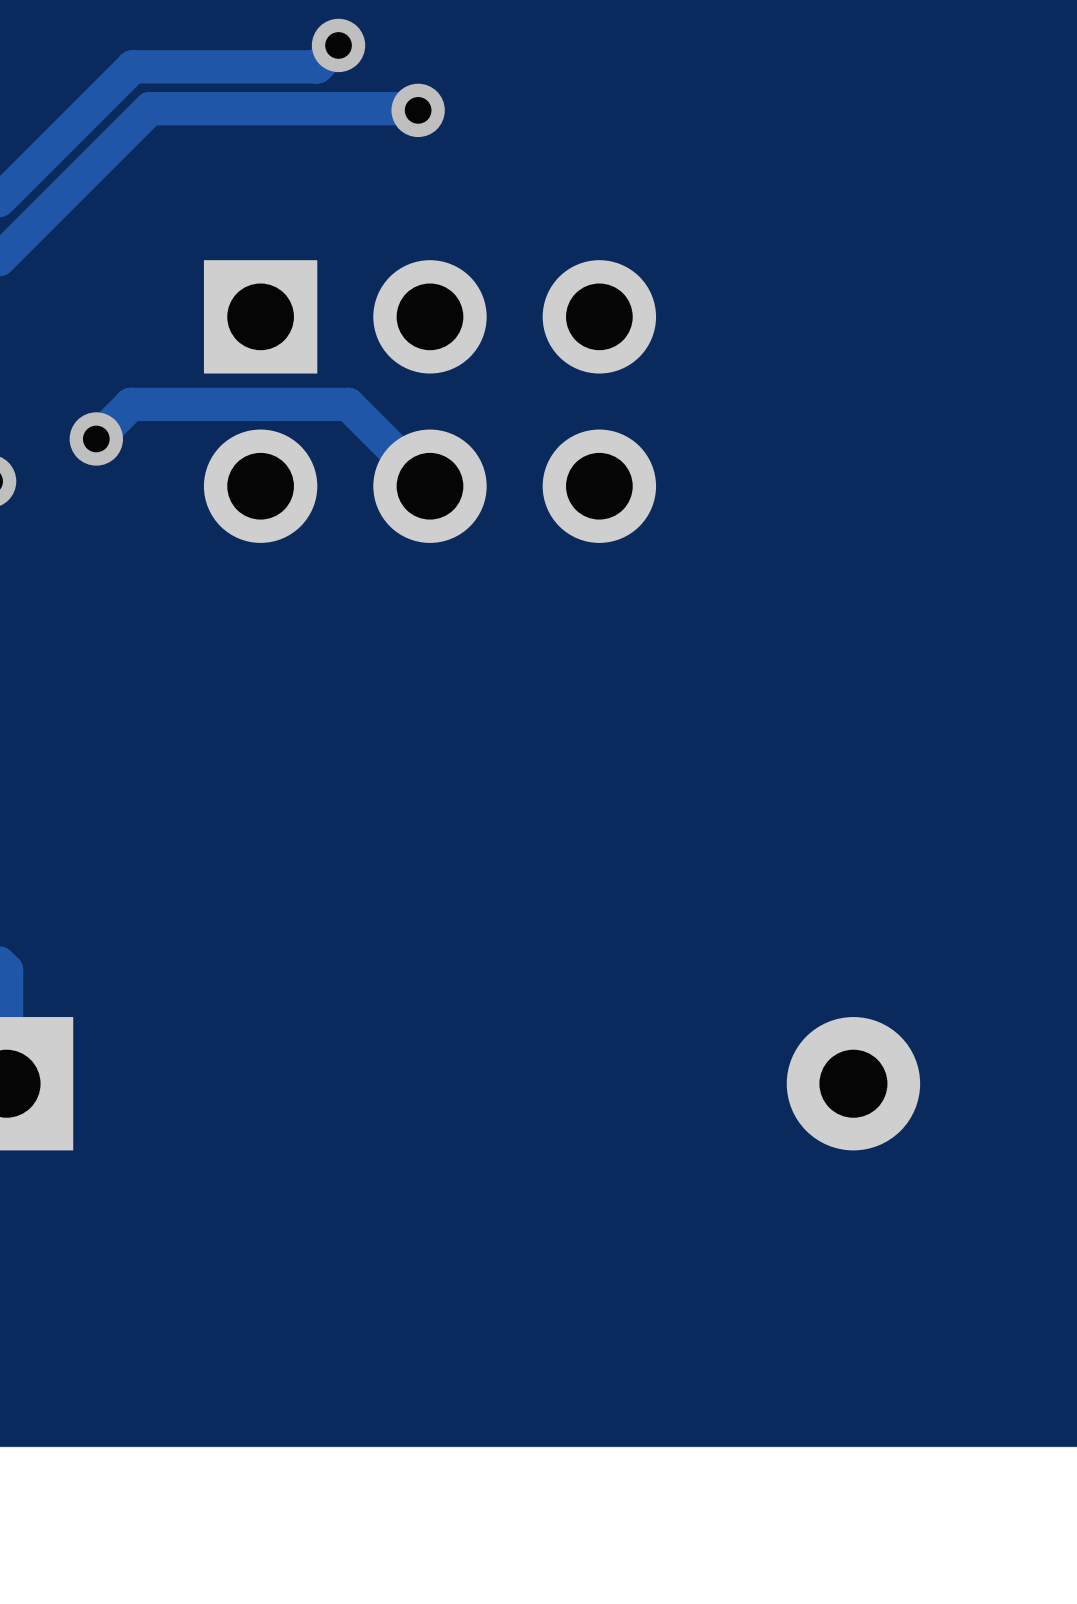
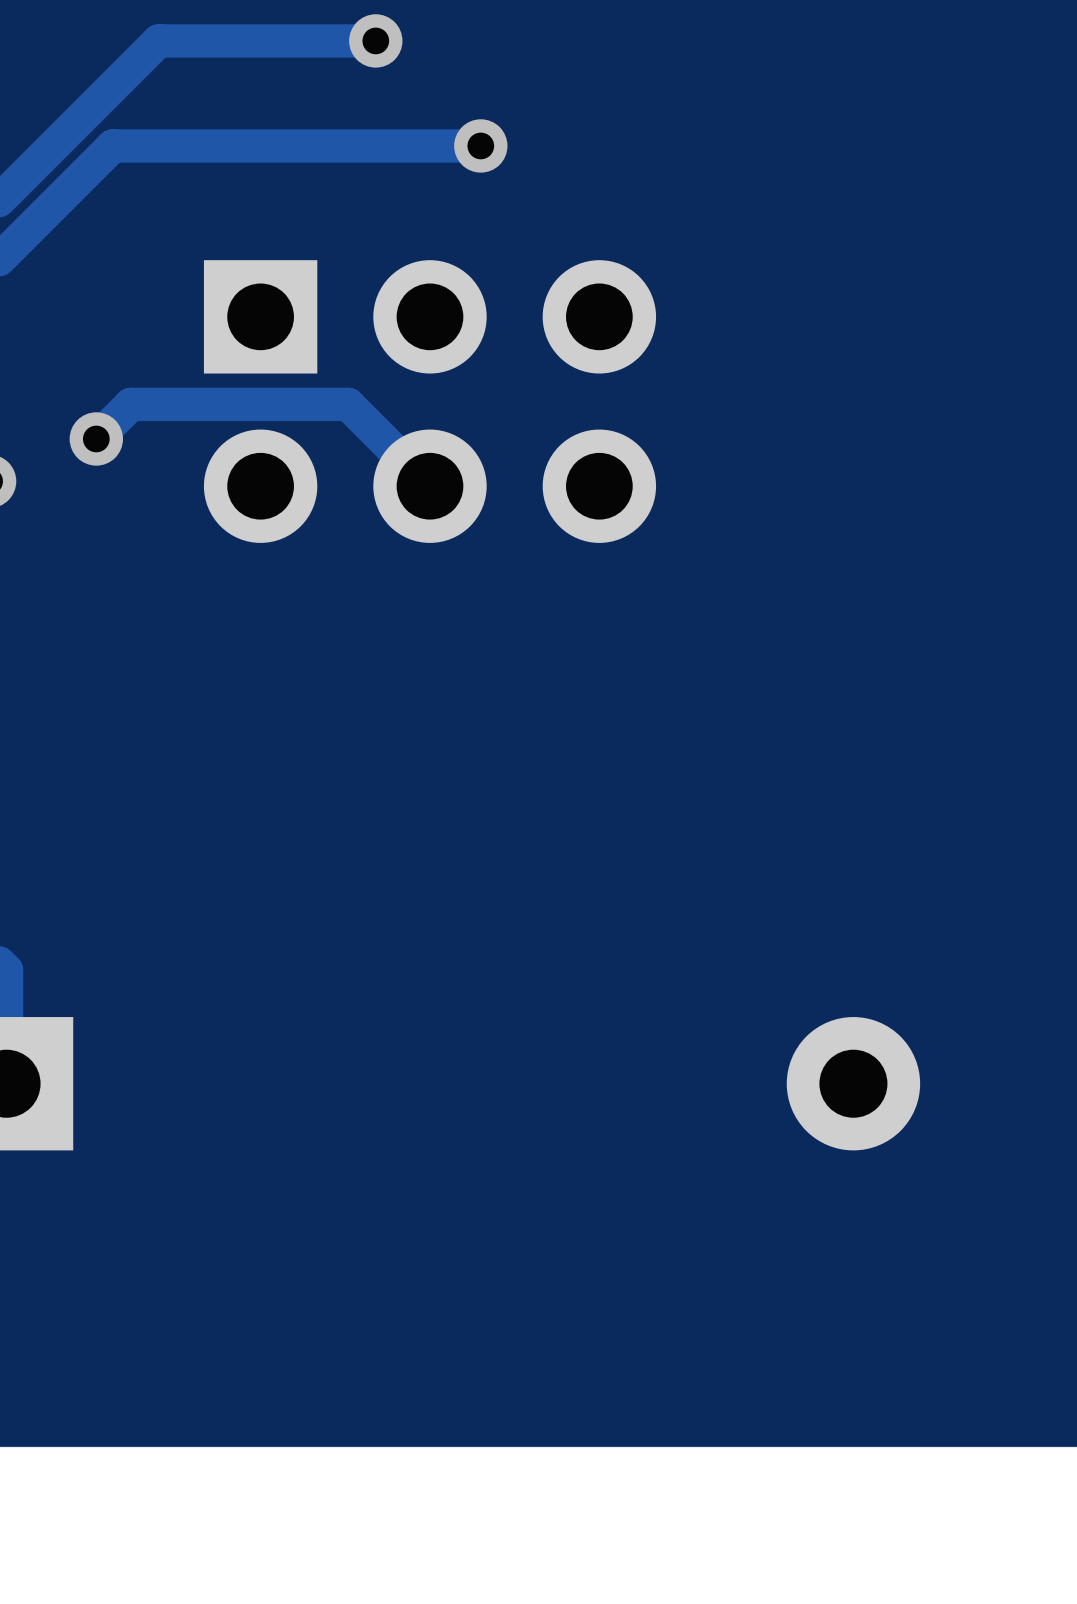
track: (338, 45) (317, 66) (132, 66) -> (375, 40) (158, 40) (132, 66)
via position: (338, 45) -> (375, 40)
track: (418, 110) (416, 108) (150, 108) (112, 145) -> (480, 145) (112, 145)
via: (418, 110) -> none
via: none -> (480, 145)

